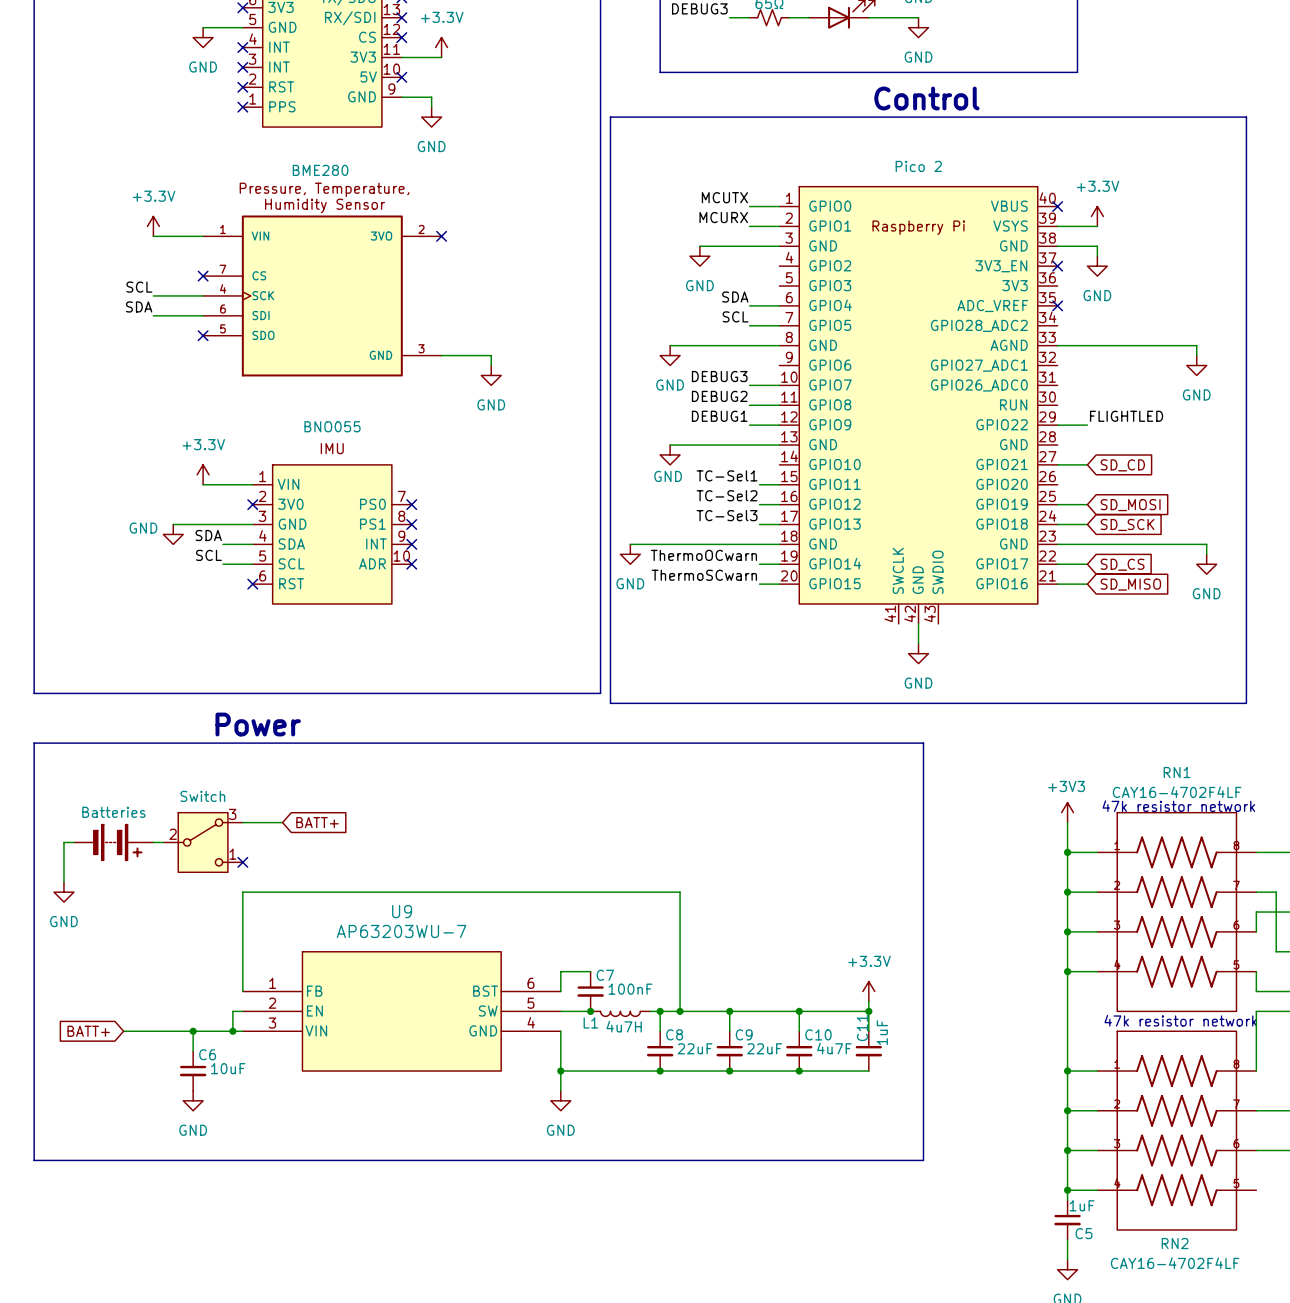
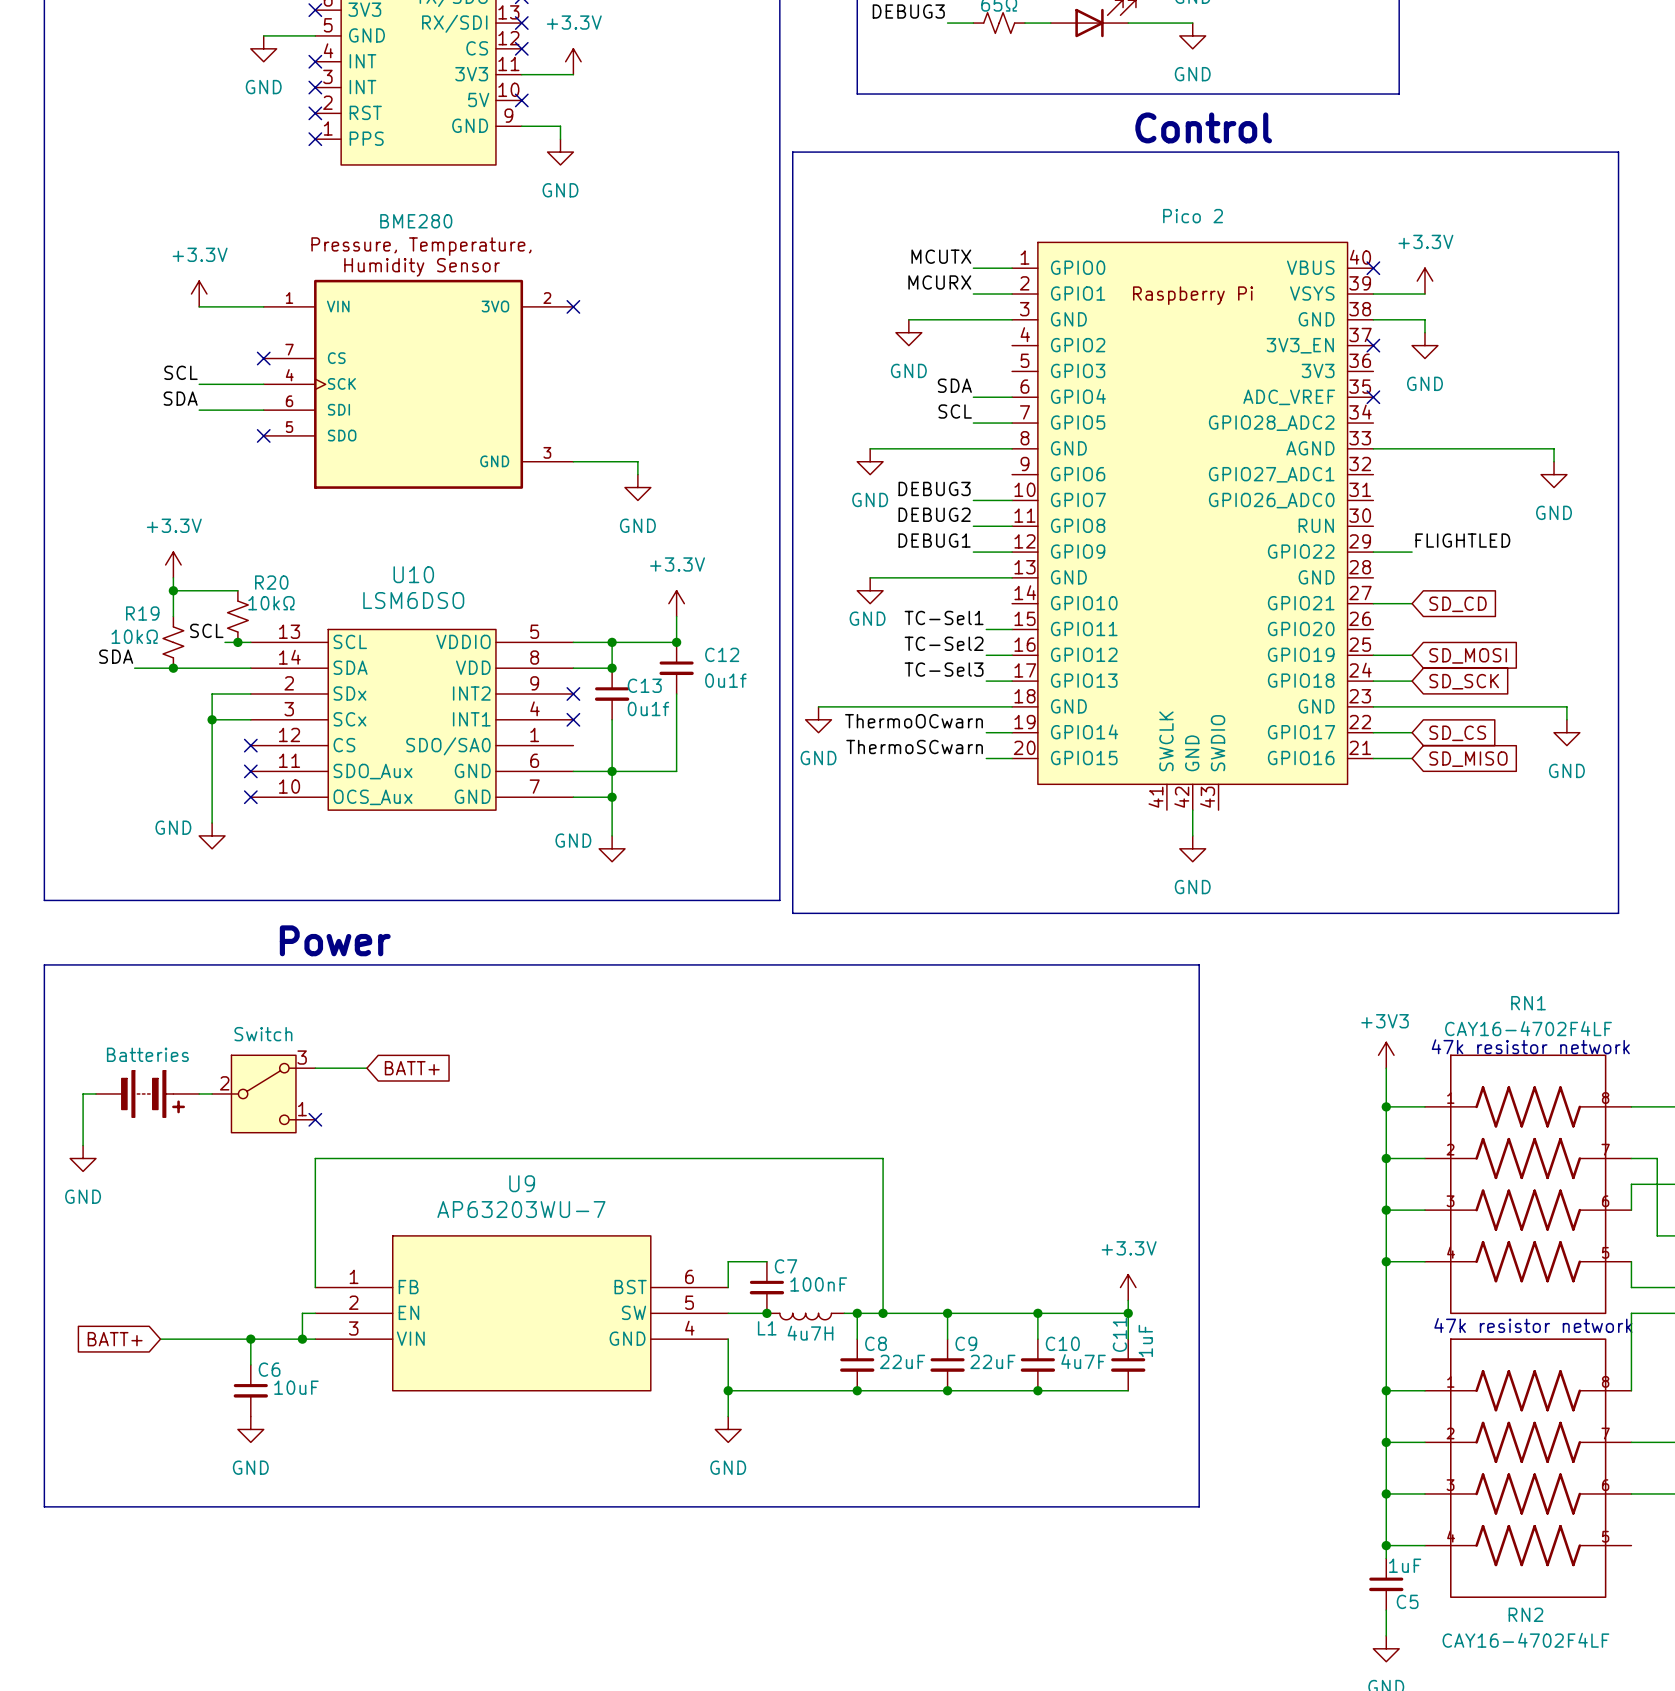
wire: none -> (173, 577) (173, 616)
junction: none -> (173, 590)
power symbol: none -> +3.3V (676, 603)
R20: none -> 10kΩ (237, 616)
power symbol position: +3.3V (203, 474) -> +3.3V (173, 564)
wire: none -> (676, 616) (676, 642) (573, 642)
wire: (203, 484) (252, 484) -> (173, 590) (237, 590)
R19: none -> 10kΩ (173, 642)
wire: none -> (225, 642) (250, 642)
junction: none -> (237, 642)
wire: none -> (612, 642) (612, 668) (573, 668)
junction: none -> (612, 642)
junction: none -> (676, 642)
no-connect mark: (252, 504) -> none
no-connect mark: (411, 504) -> none
wire: none -> (134, 668) (250, 668)
junction: none -> (173, 668)
junction: none -> (612, 668)
C12: none -> 0u1f (676, 668)
wire: (173, 524) (252, 524) -> none
no-connect mark: (411, 524) -> none
power symbol position: GND (173, 534) -> GND (212, 835)
wire: none -> (250, 693) (212, 693) (212, 823)
part: BNO055 (332, 534) -> none
no-connect mark: none -> (573, 693)
C13: none -> 0u1f (612, 693)
wire: none -> (676, 693) (676, 771) (573, 771)
label position: SDA (208, 535) -> SDA (116, 656)
wire: (222, 544) (252, 544) -> (212, 719) (250, 719)
no-connect mark: (411, 544) -> none
junction: none -> (212, 719)
U10: none -> LSM6DSO (412, 719)
no-connect mark: none -> (573, 719)
wire: none -> (612, 719) (612, 835)
label position: SCL (208, 555) -> SCL (206, 630)
wire: (222, 564) (252, 564) -> none
no-connect mark: (411, 564) -> none
no-connect mark: none -> (250, 745)
no-connect mark: (252, 584) -> none
no-connect mark: none -> (250, 771)
junction: none -> (612, 771)
no-connect mark: none -> (250, 797)
wire: none -> (573, 797) (612, 797)
junction: none -> (612, 797)
power symbol: none -> GND (612, 848)

